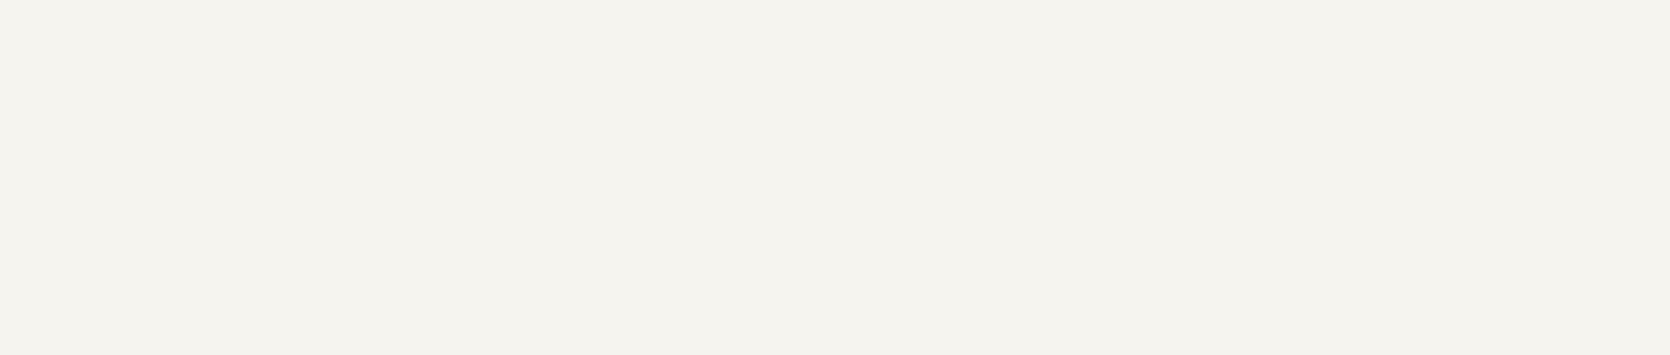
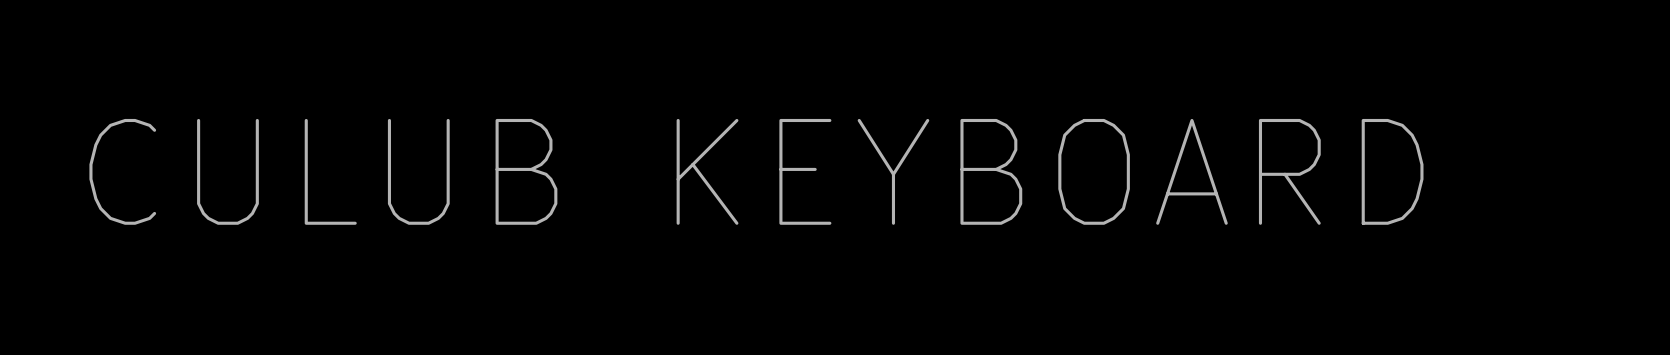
label: none -> CULUB KEYBOARD (756, 171)

